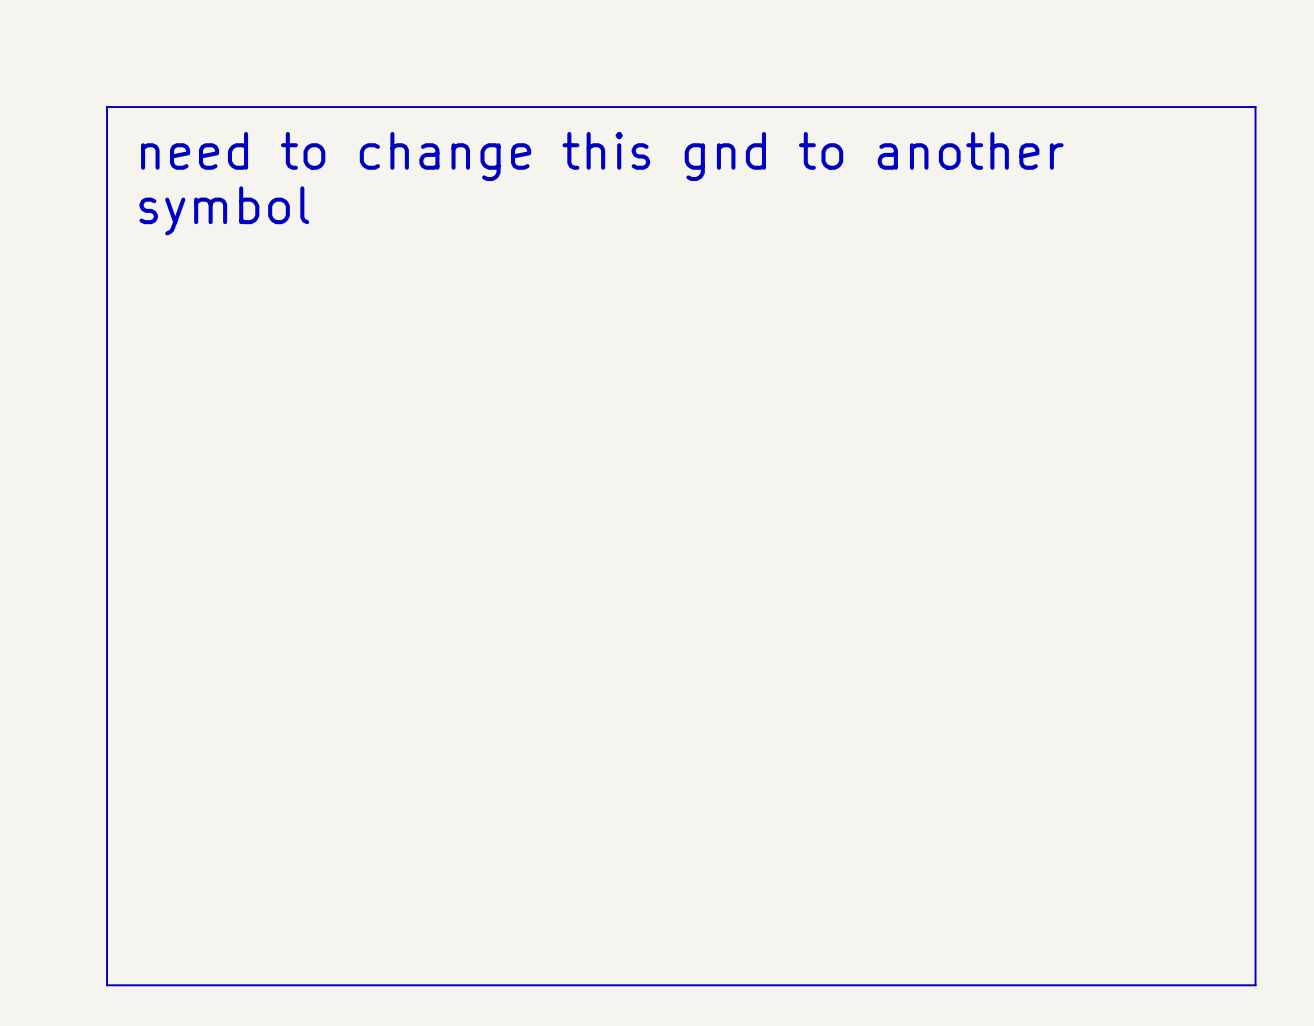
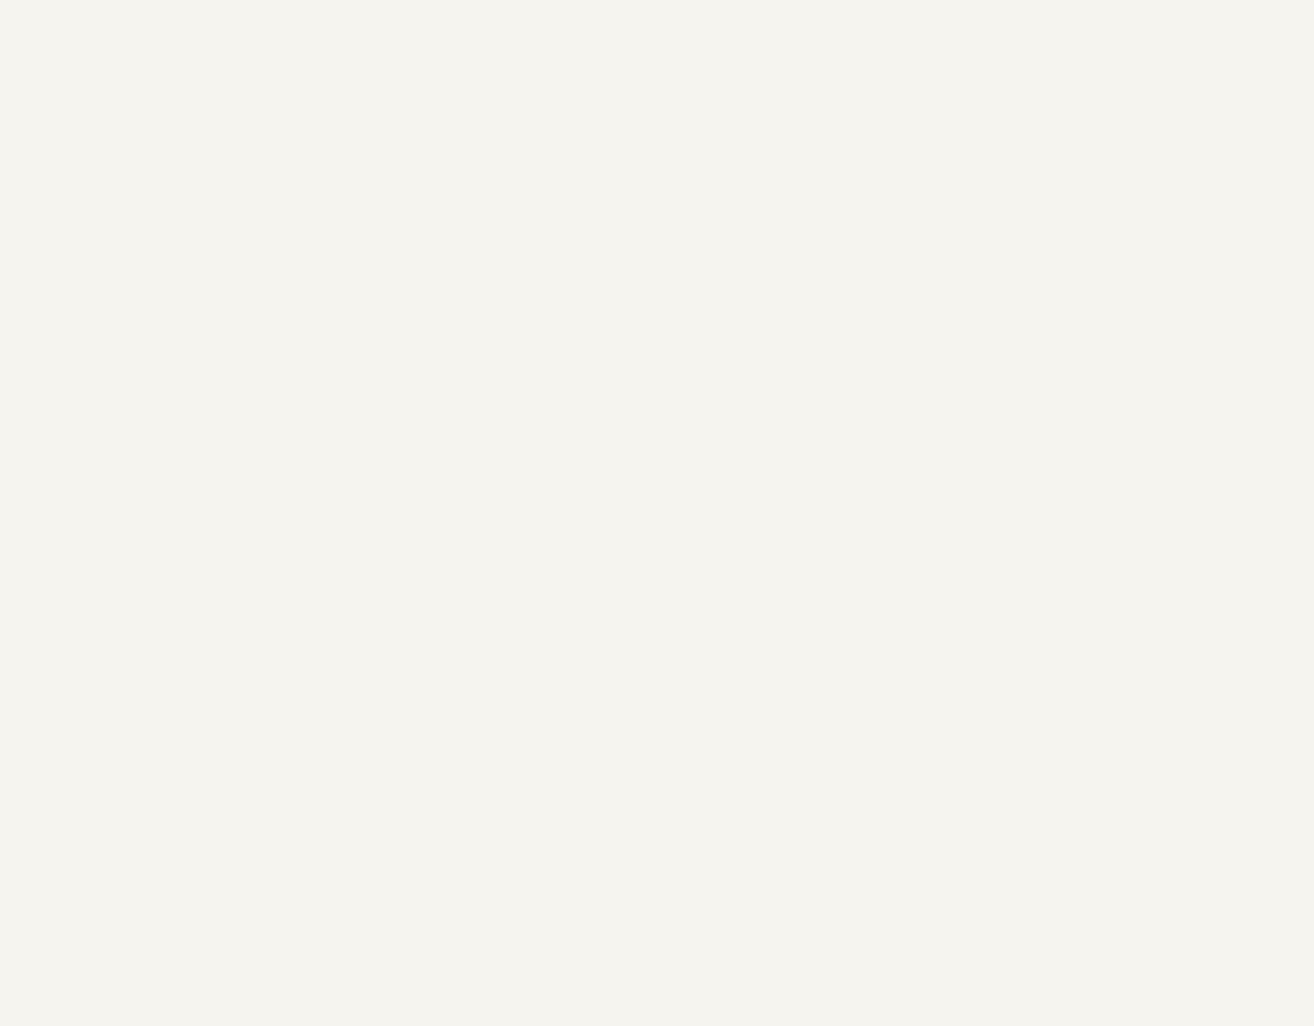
line: (107, 107) (1255, 107) (1255, 985) (107, 985) (107, 107) -> none
text: need to change this gnd to another (602, 156) -> none
text: symbol (224, 210) -> none

